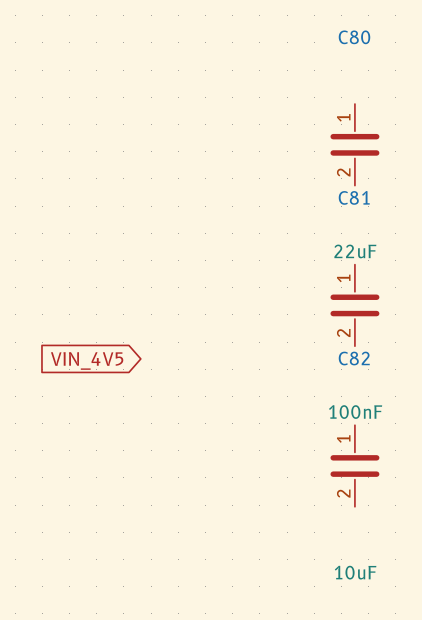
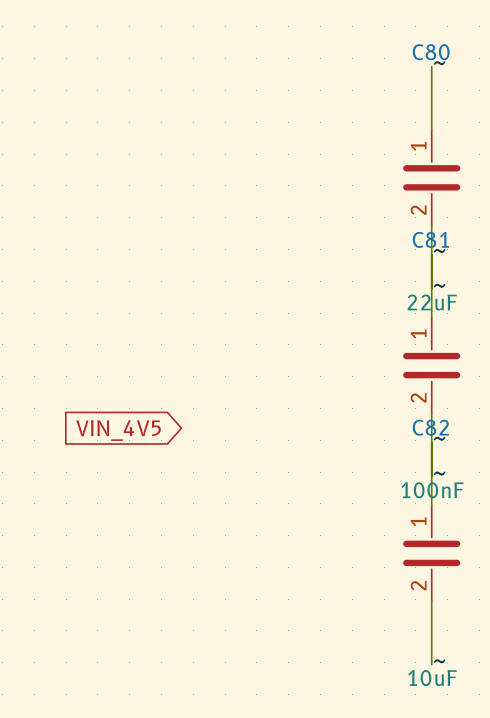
label: none -> ~ (439, 63)
wire: none -> (431, 66) (431, 130)
wire: none -> (431, 225) (431, 317)
label: none -> ~ (439, 250)
label: none -> ~ (439, 285)
wire: none -> (431, 413) (431, 505)
label: none -> ~ (439, 438)
label: none -> ~ (439, 473)
wire: none -> (431, 601) (431, 664)
label: none -> ~ (439, 661)

